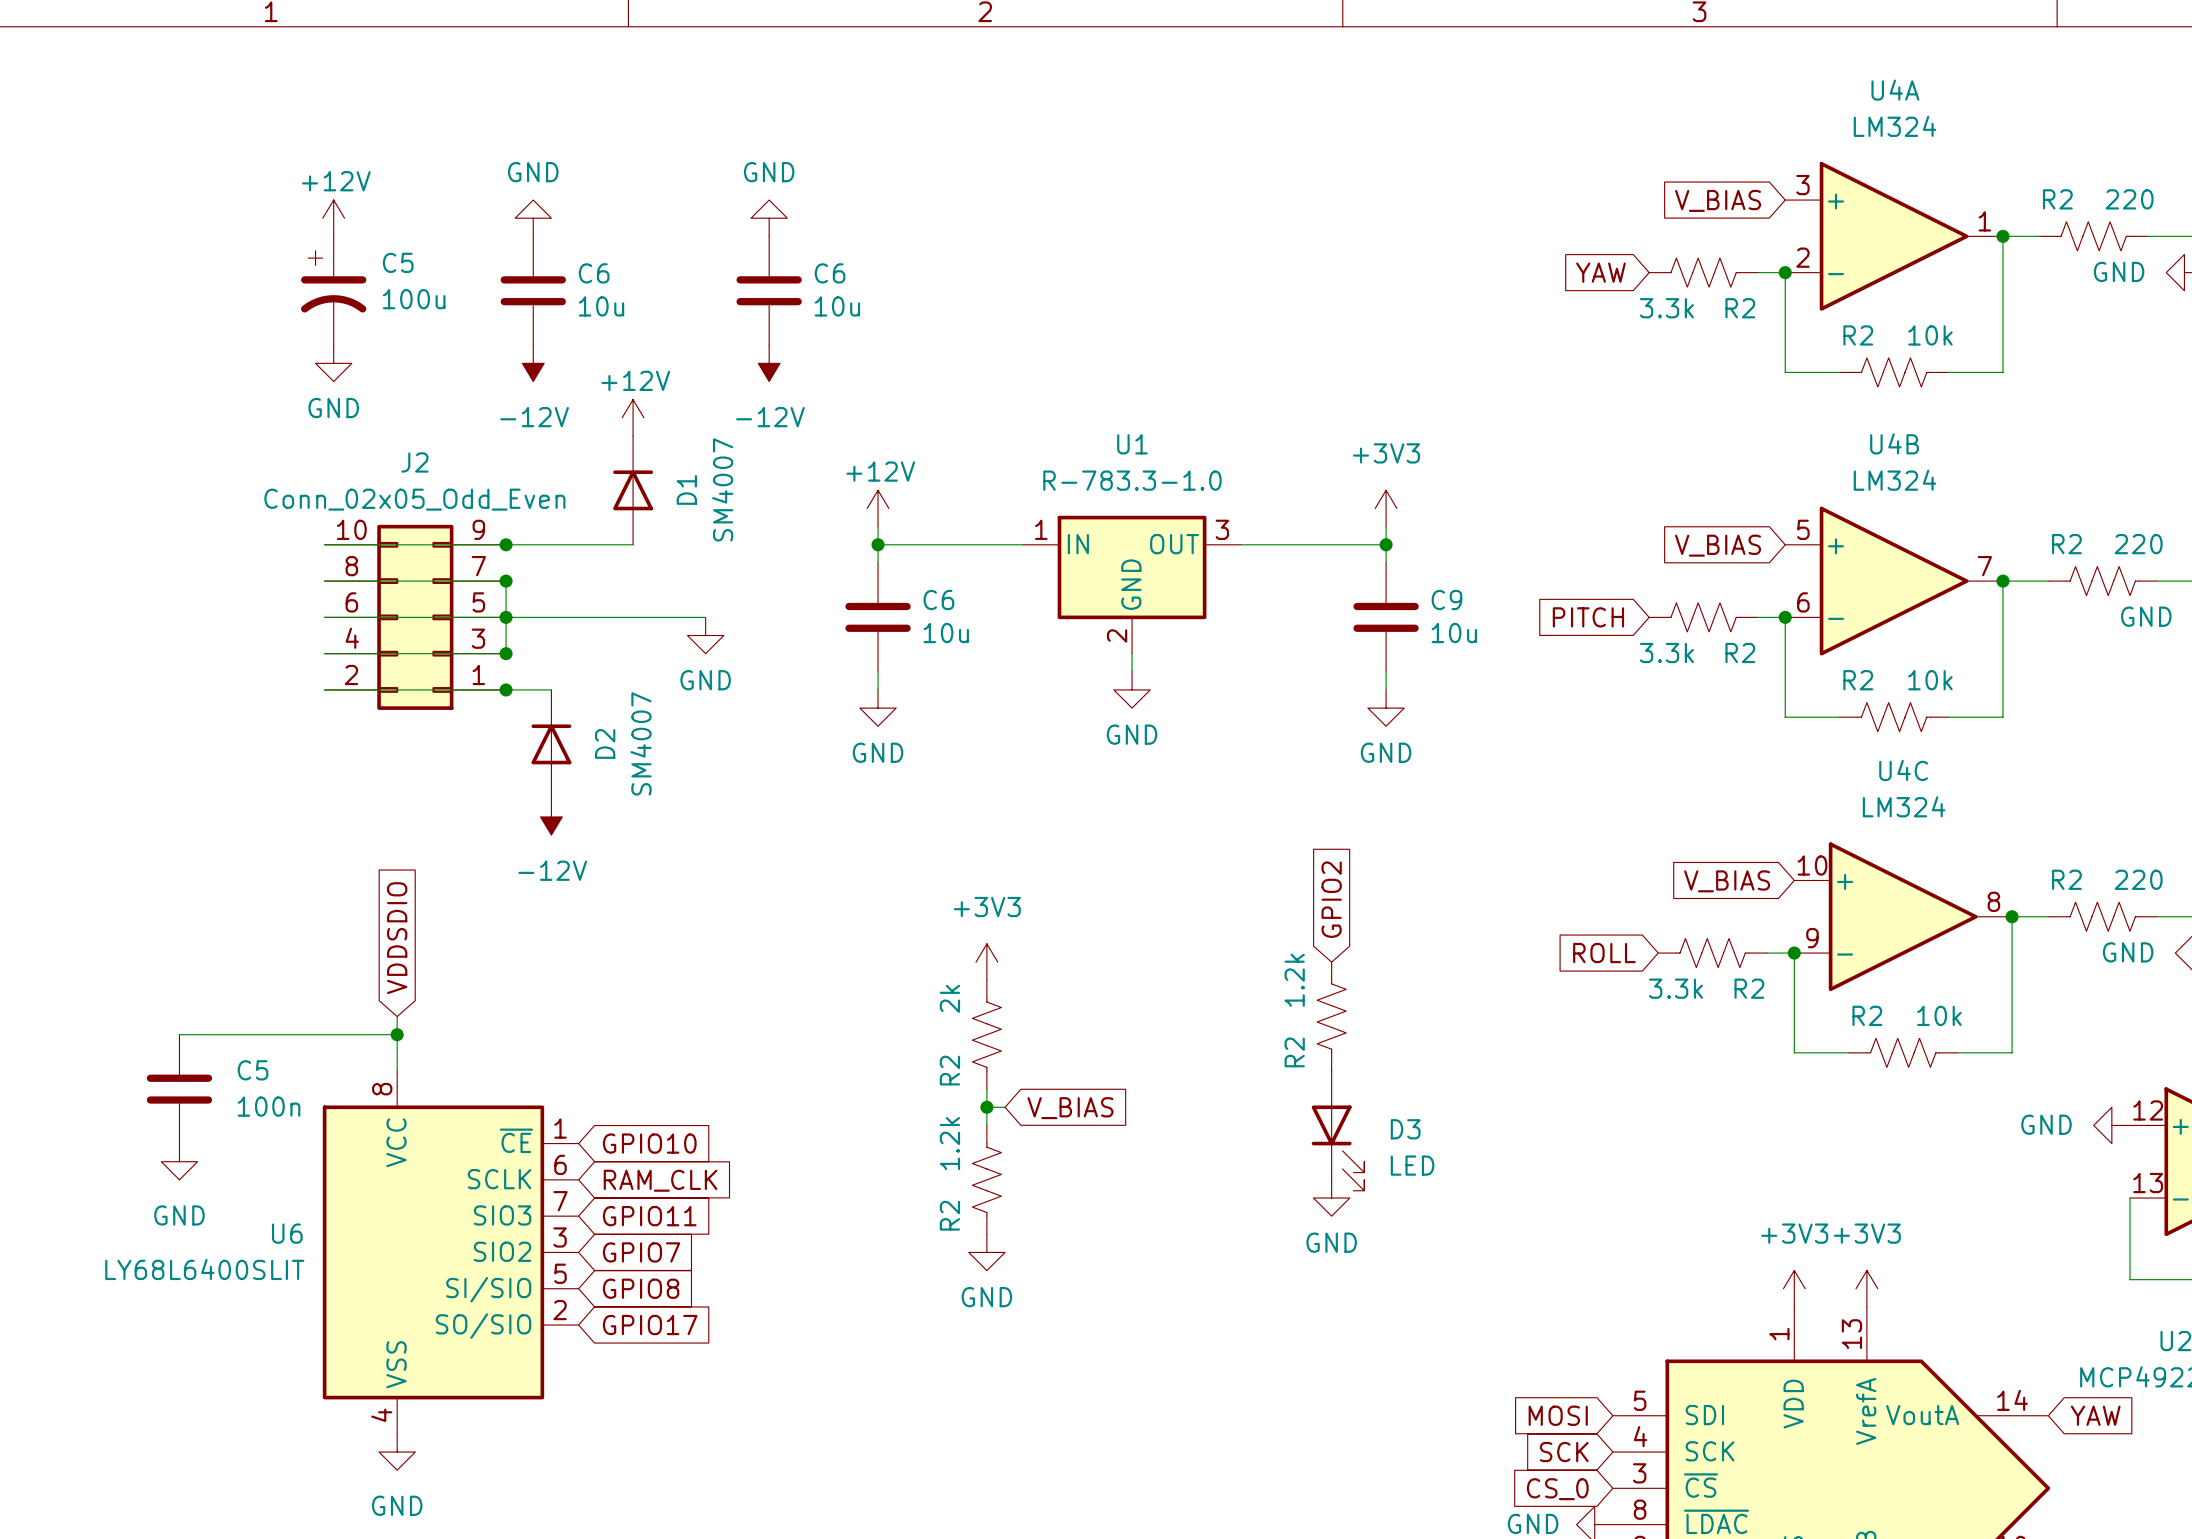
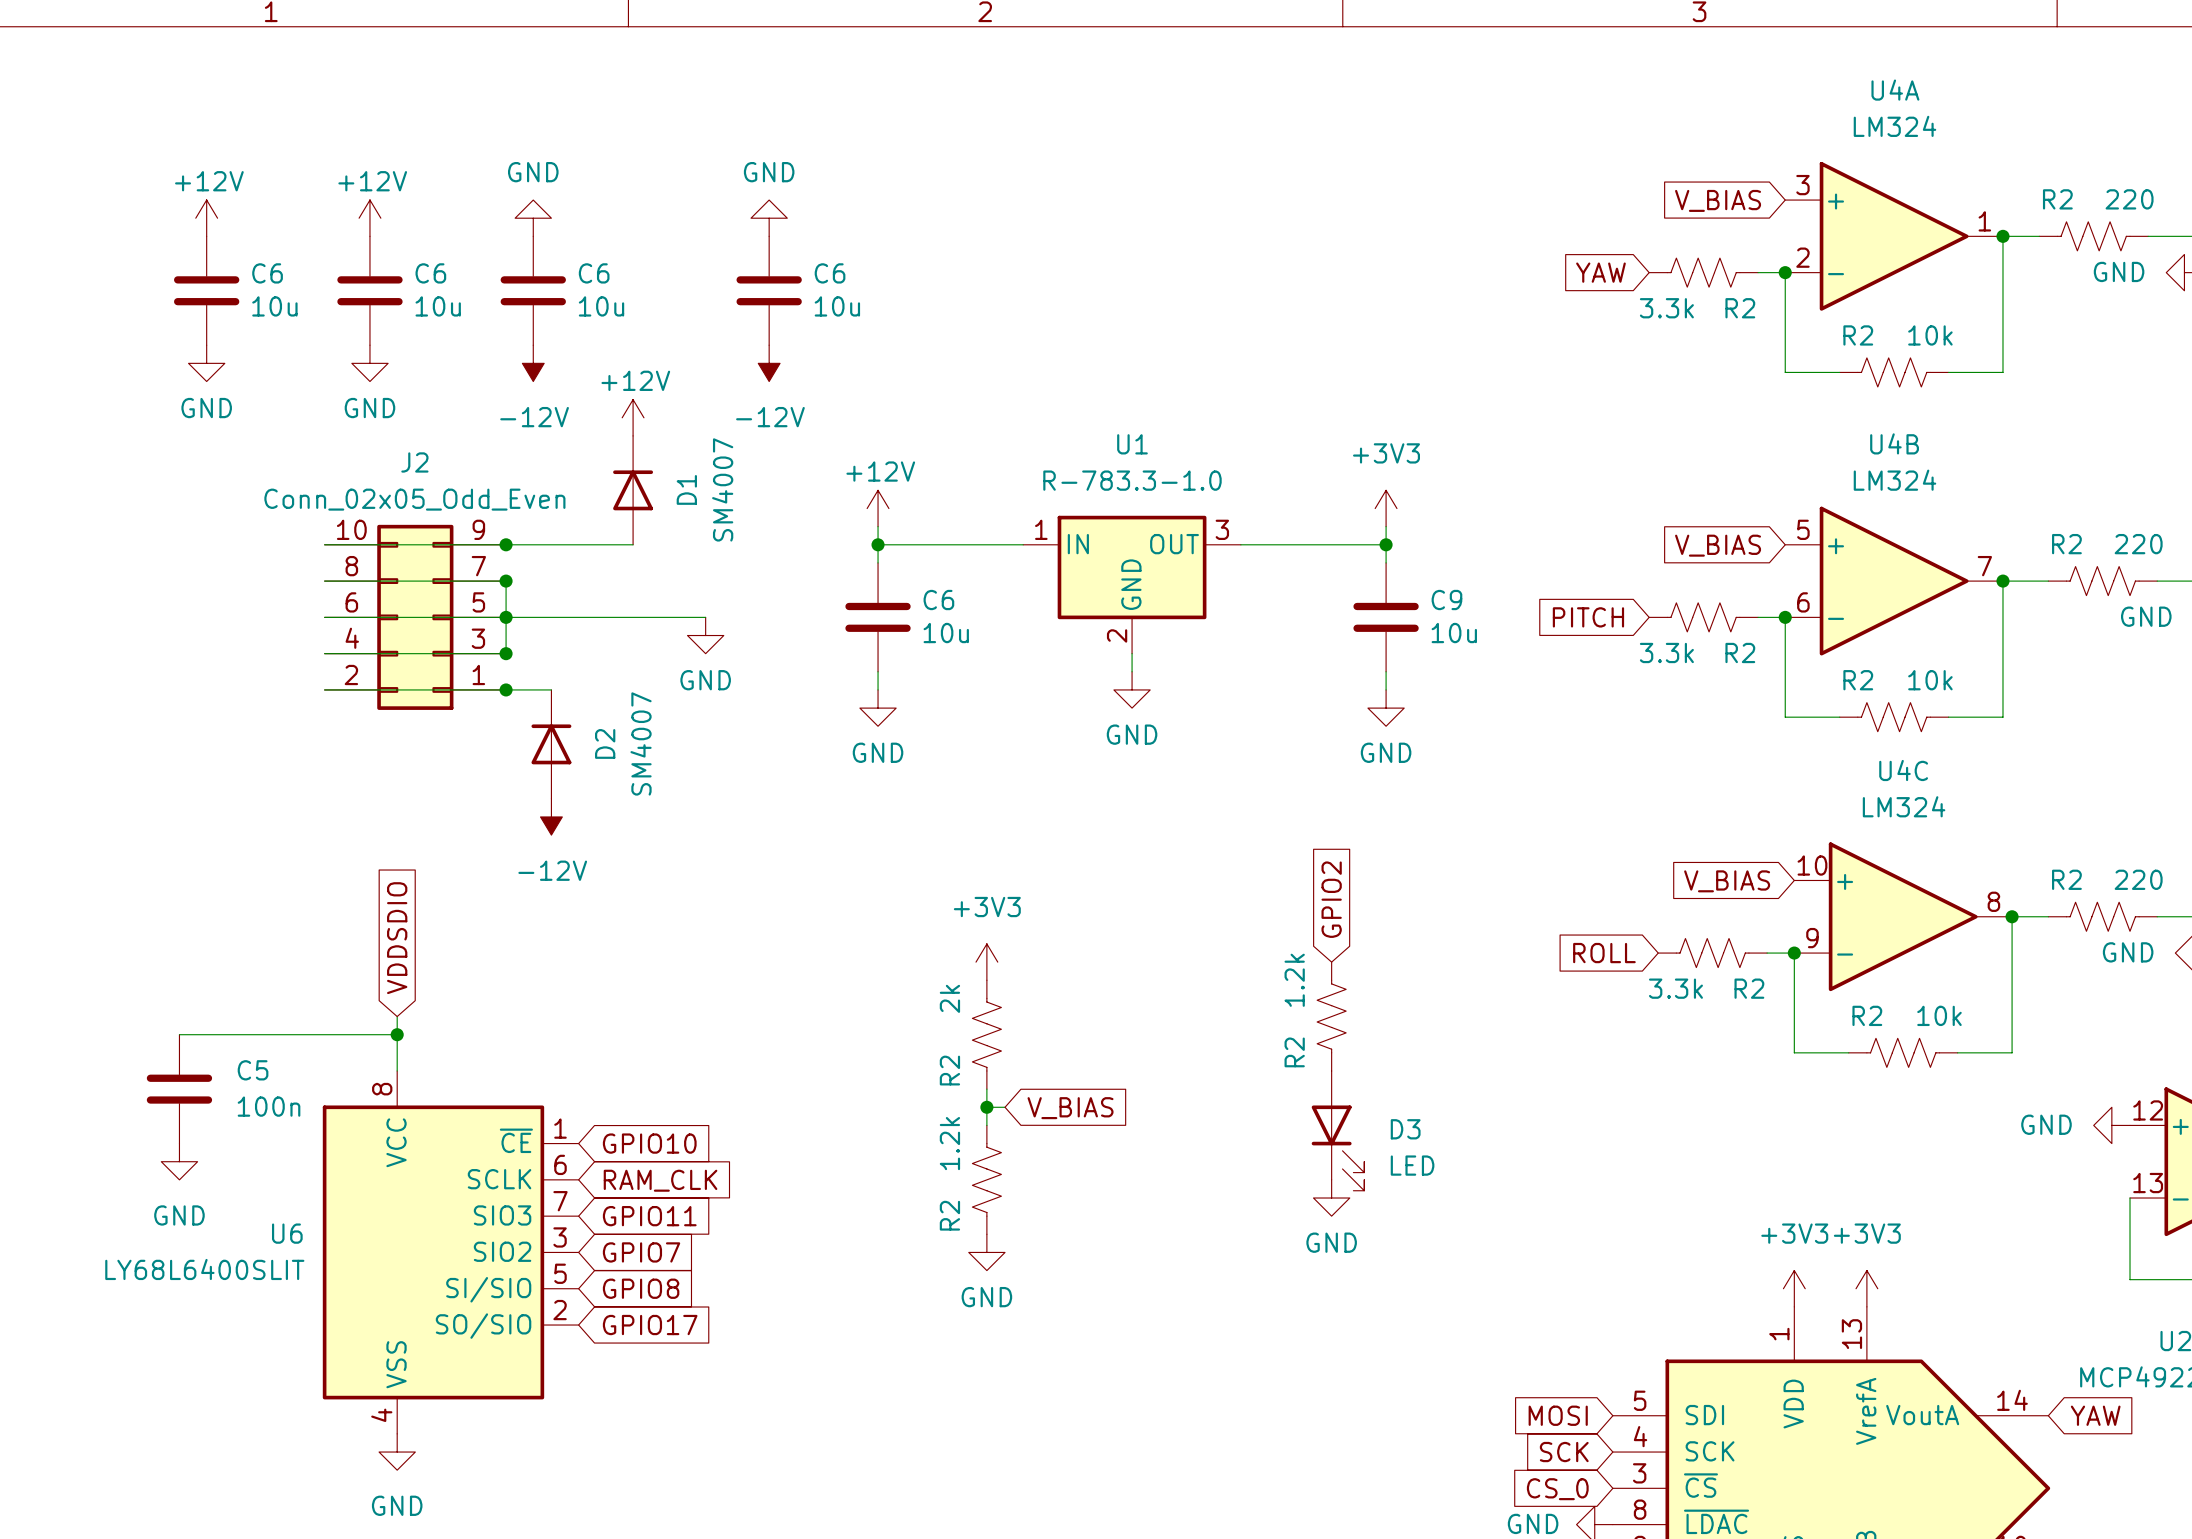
power symbol: none -> +12V (206, 218)
power symbol position: +12V (333, 218) -> +12V (369, 218)
C6: none -> 10u (206, 290)
C5: 100u (333, 290) -> none
C6: none -> 10u (369, 290)
power symbol: none -> GND (206, 363)
power symbol position: GND (333, 363) -> GND (369, 363)

